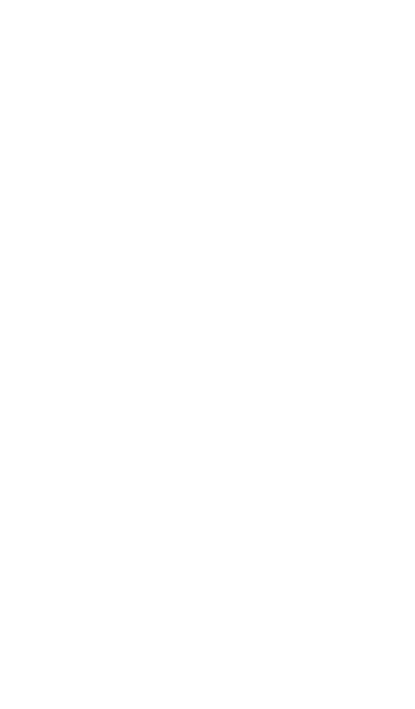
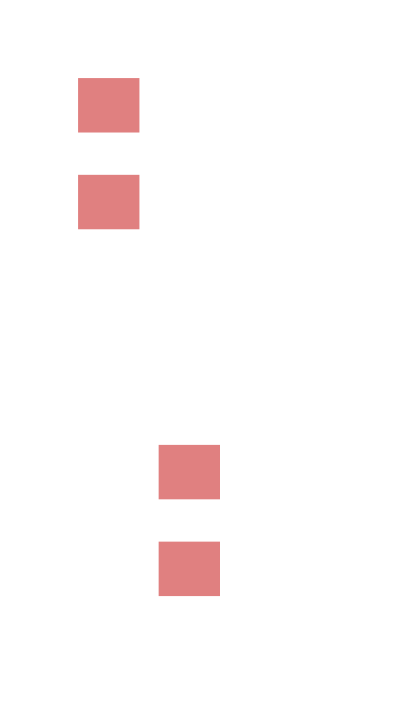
part: none -> (108, 153)
part: none -> (189, 520)

